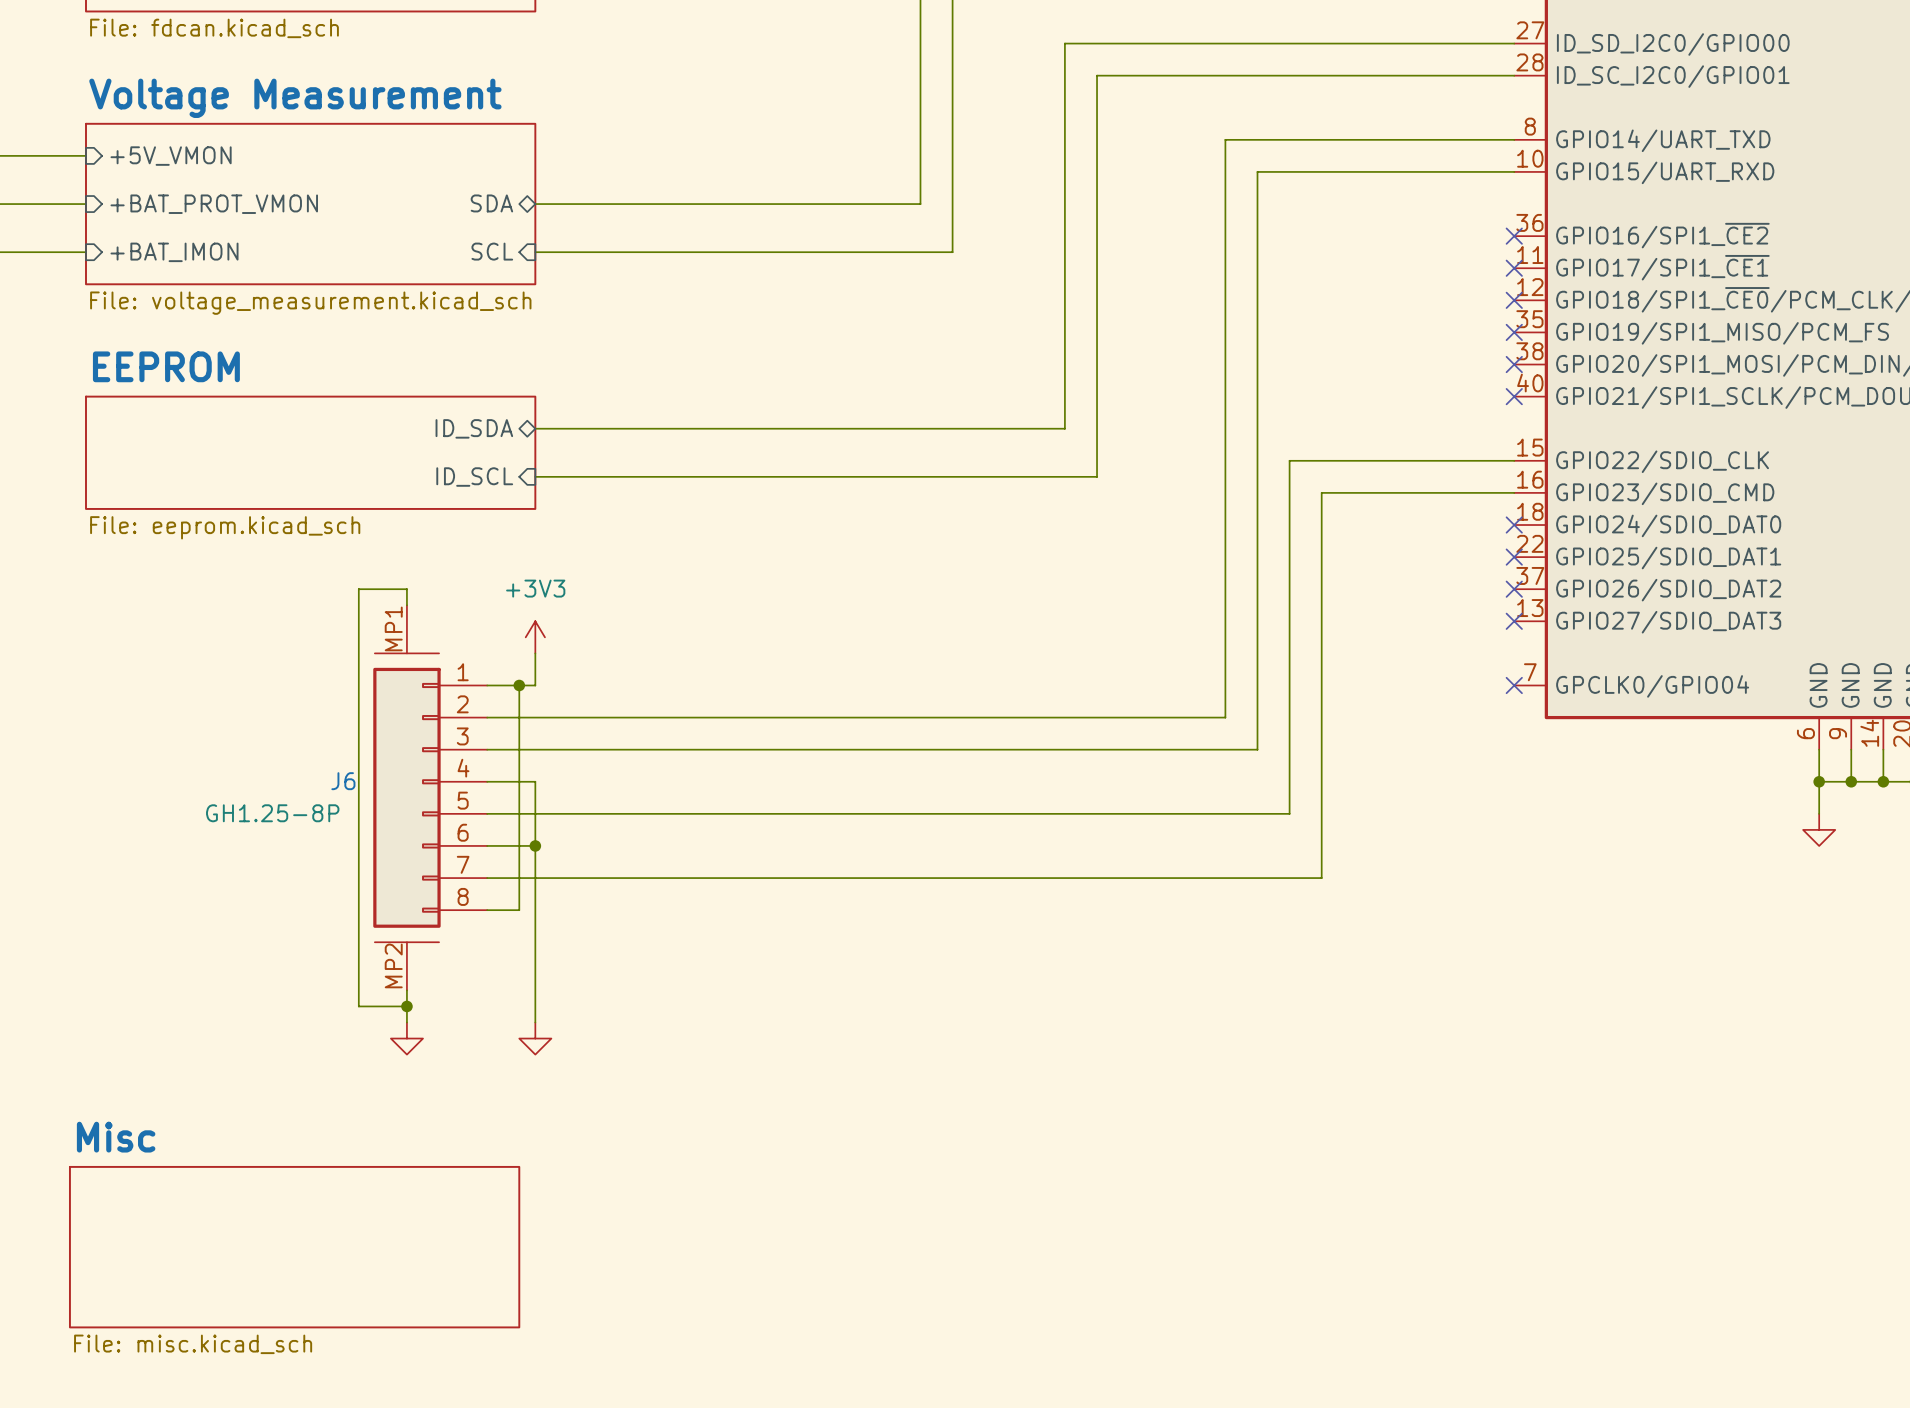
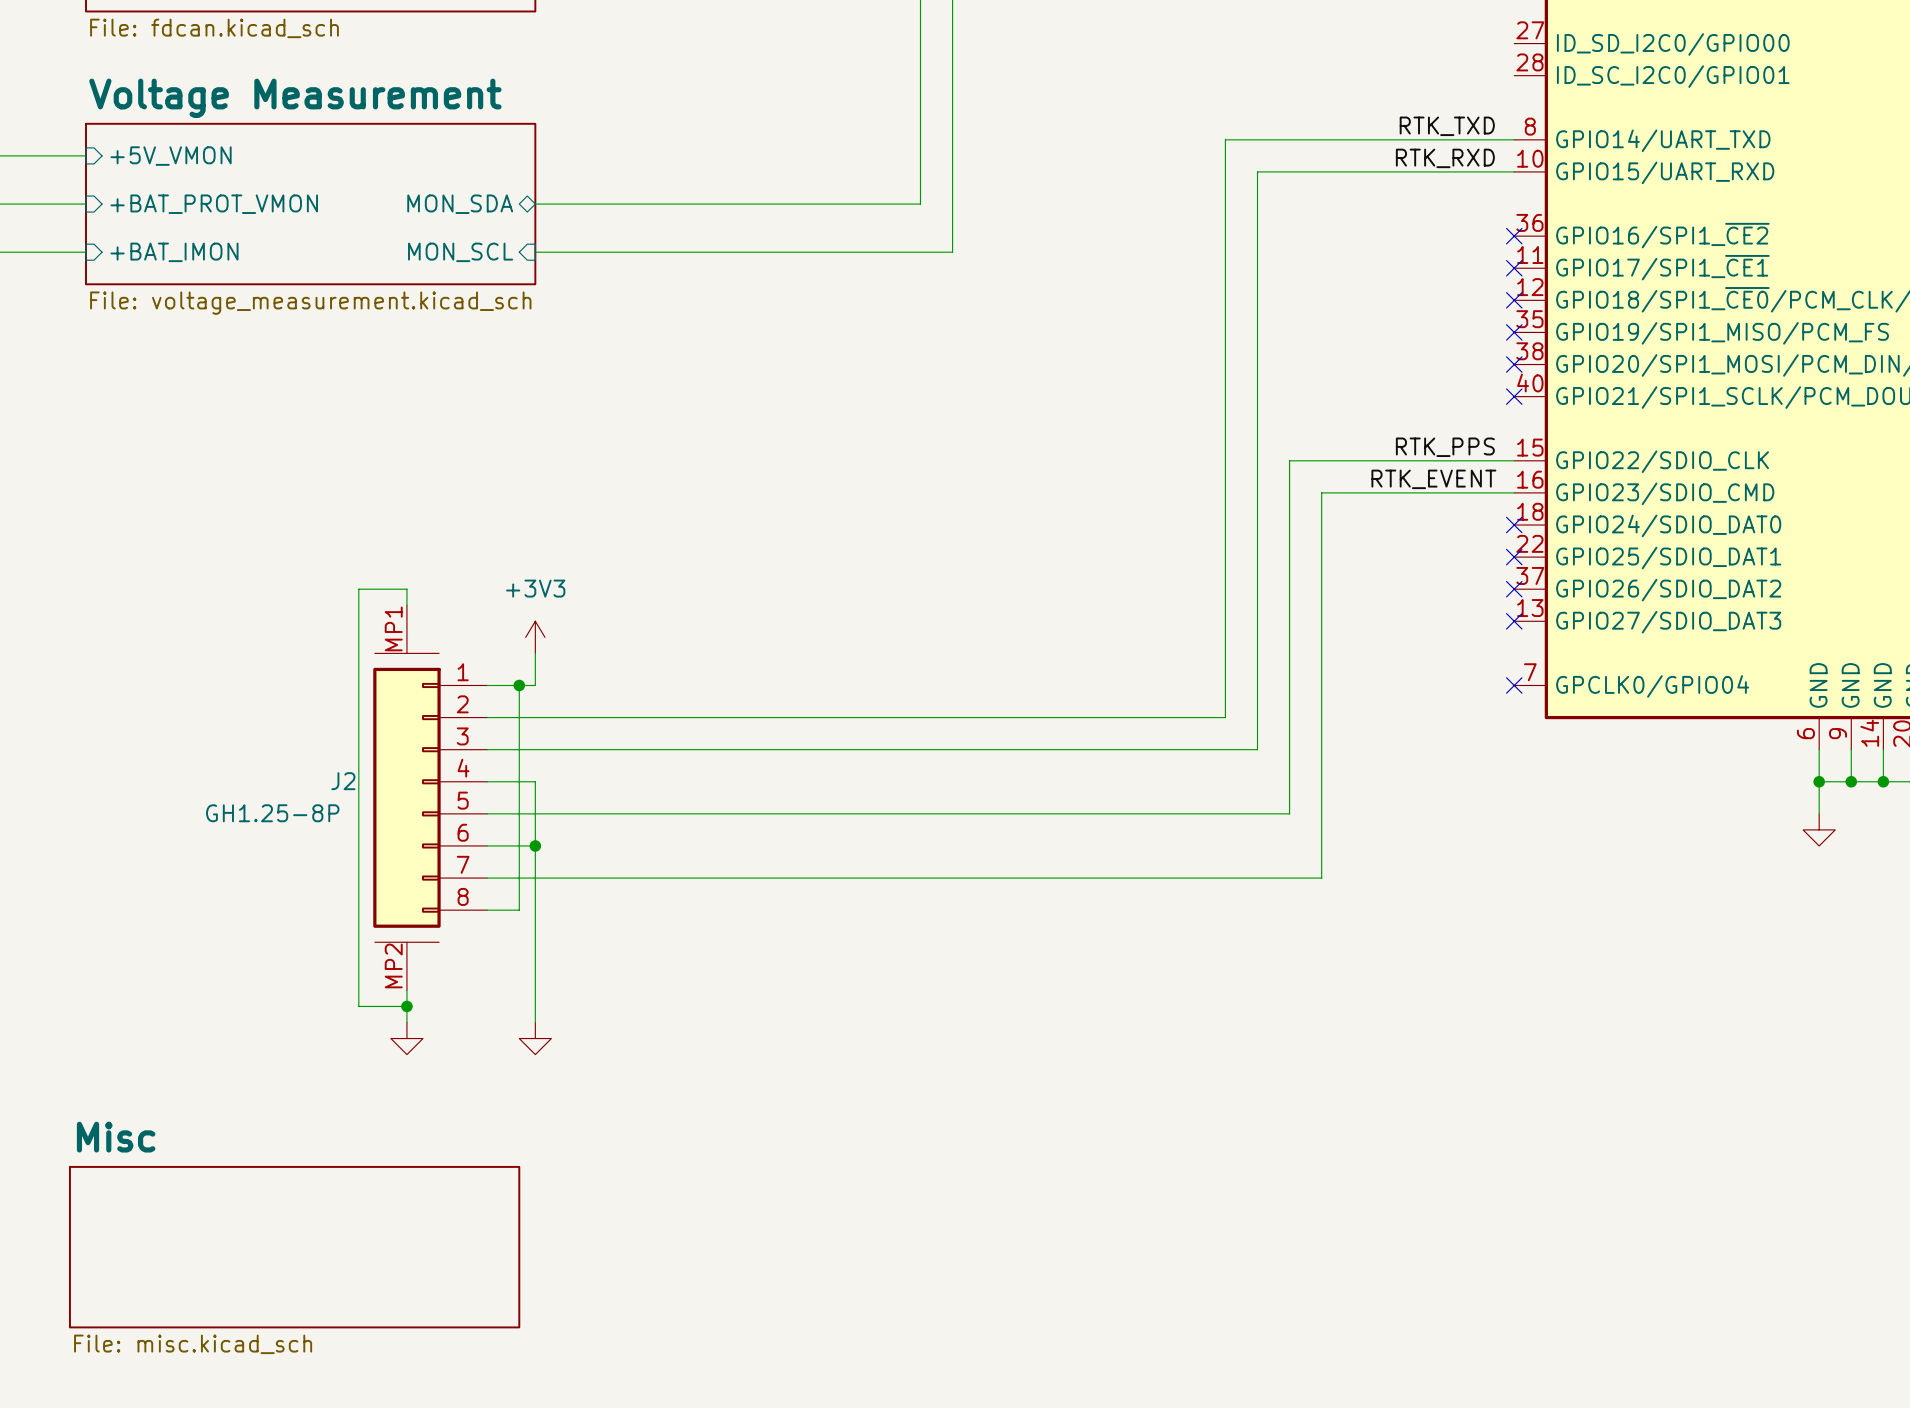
wire: (1514, 43) (1064, 43) (1064, 428) (535, 428) -> none
wire: (1514, 75) (1097, 75) (1097, 476) (535, 476) -> none
label: none -> RTK_TXD (1447, 126)
label: none -> RTK_RXD (1445, 158)
sheet pin: SDA (491, 203) -> MON_SDA (460, 204)
sheet pin: SCL (492, 251) -> MON_SCL (460, 252)
sheet pin: ID_SDA (474, 428) -> none
label: none -> RTK_PPS (1445, 447)
sheet EEPROM: File: eeprom.kicad_sch (310, 452) -> none
sheet pin: ID_SCL (474, 477) -> none
label: none -> RTK_EVENT (1433, 479)
J6 name: J6 (343, 781) -> J2 (343, 781)

